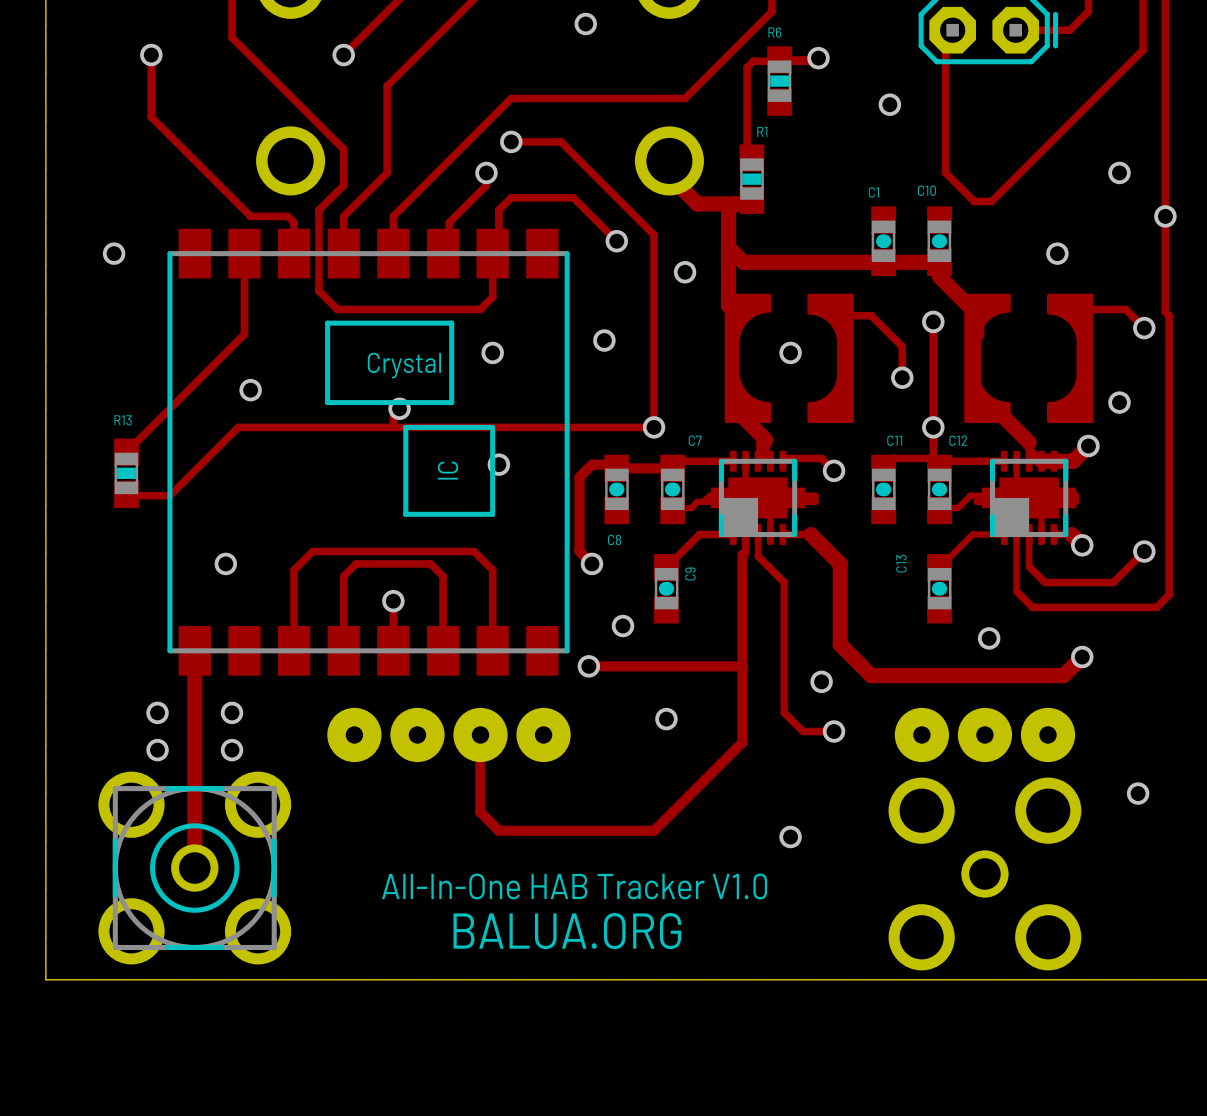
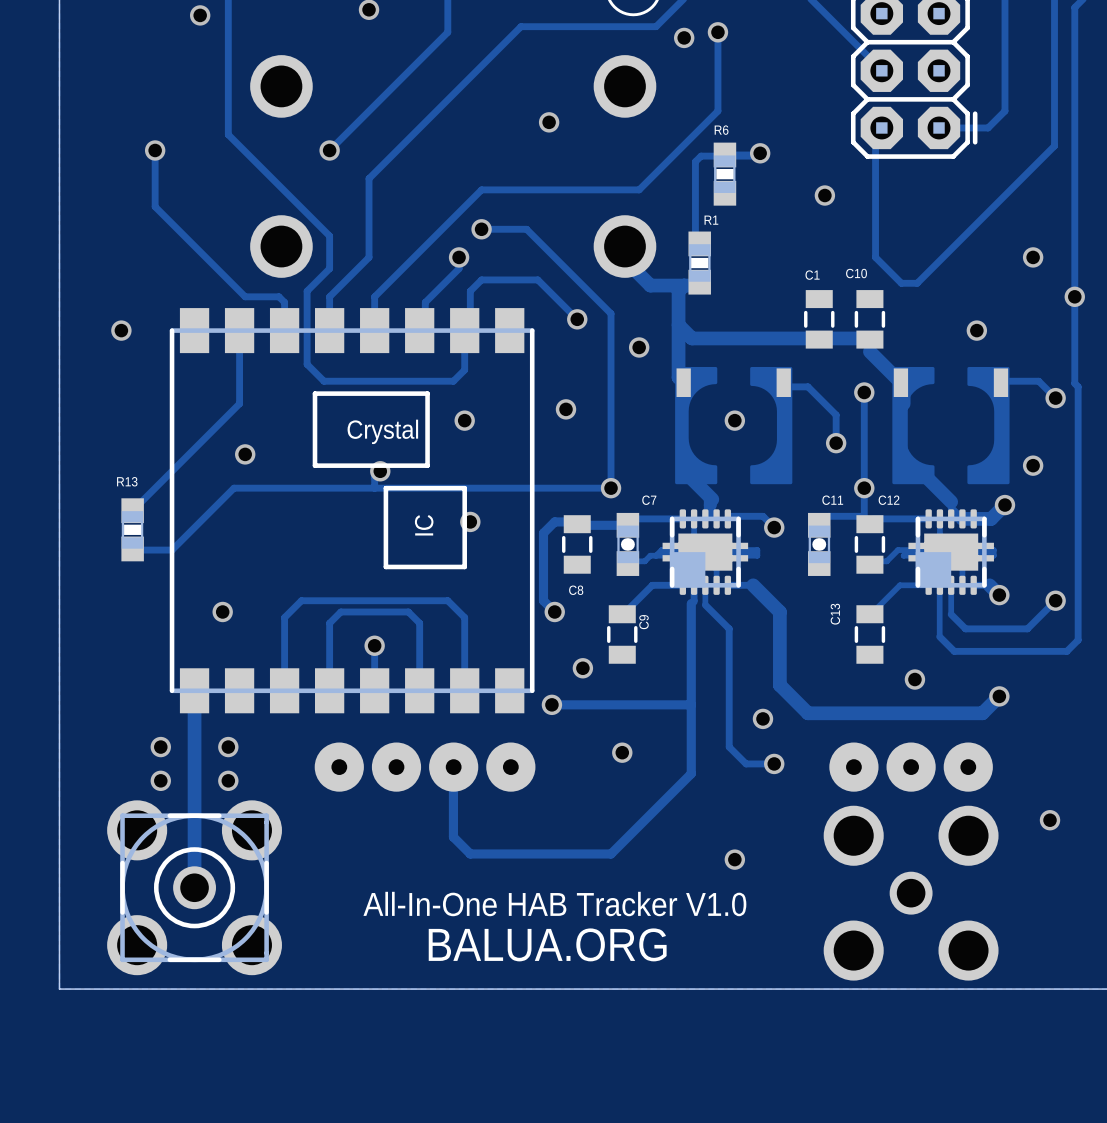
C1 footprint: [871, 206, 897, 276] -> [804, 290, 835, 349]
C10 footprint: [927, 206, 952, 276] -> [854, 290, 886, 349]
C8 footprint: [604, 454, 630, 525] -> [562, 515, 593, 574]
C12 footprint: [927, 454, 952, 525] -> [854, 515, 886, 574]
C9 footprint: [654, 554, 679, 624] -> [607, 605, 638, 664]
C13 footprint: [927, 554, 952, 624] -> [854, 605, 886, 664]

